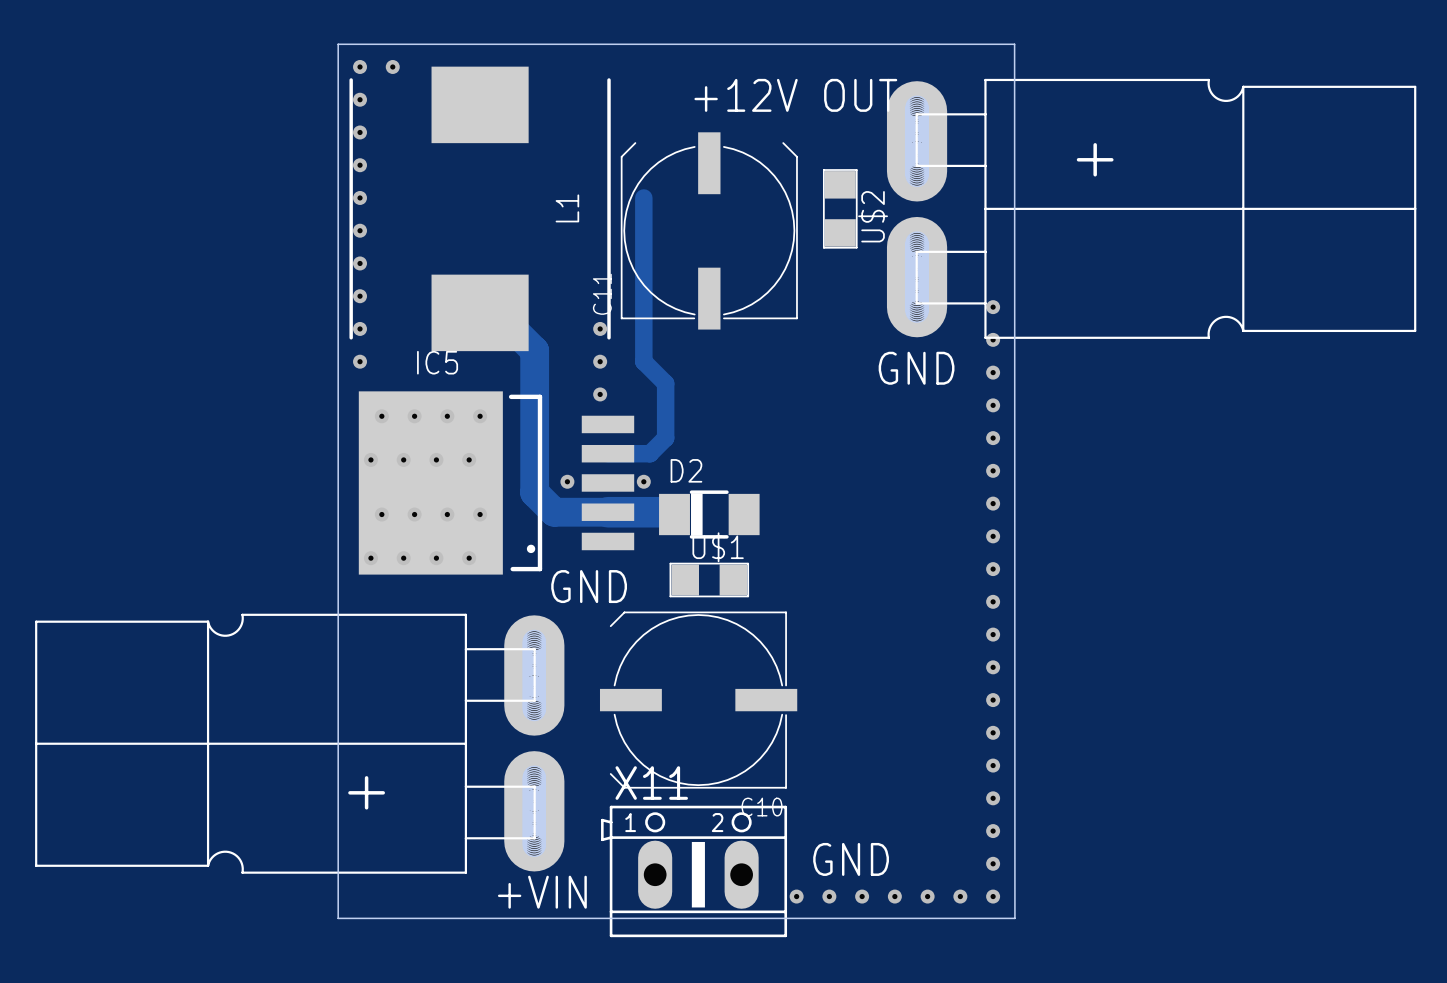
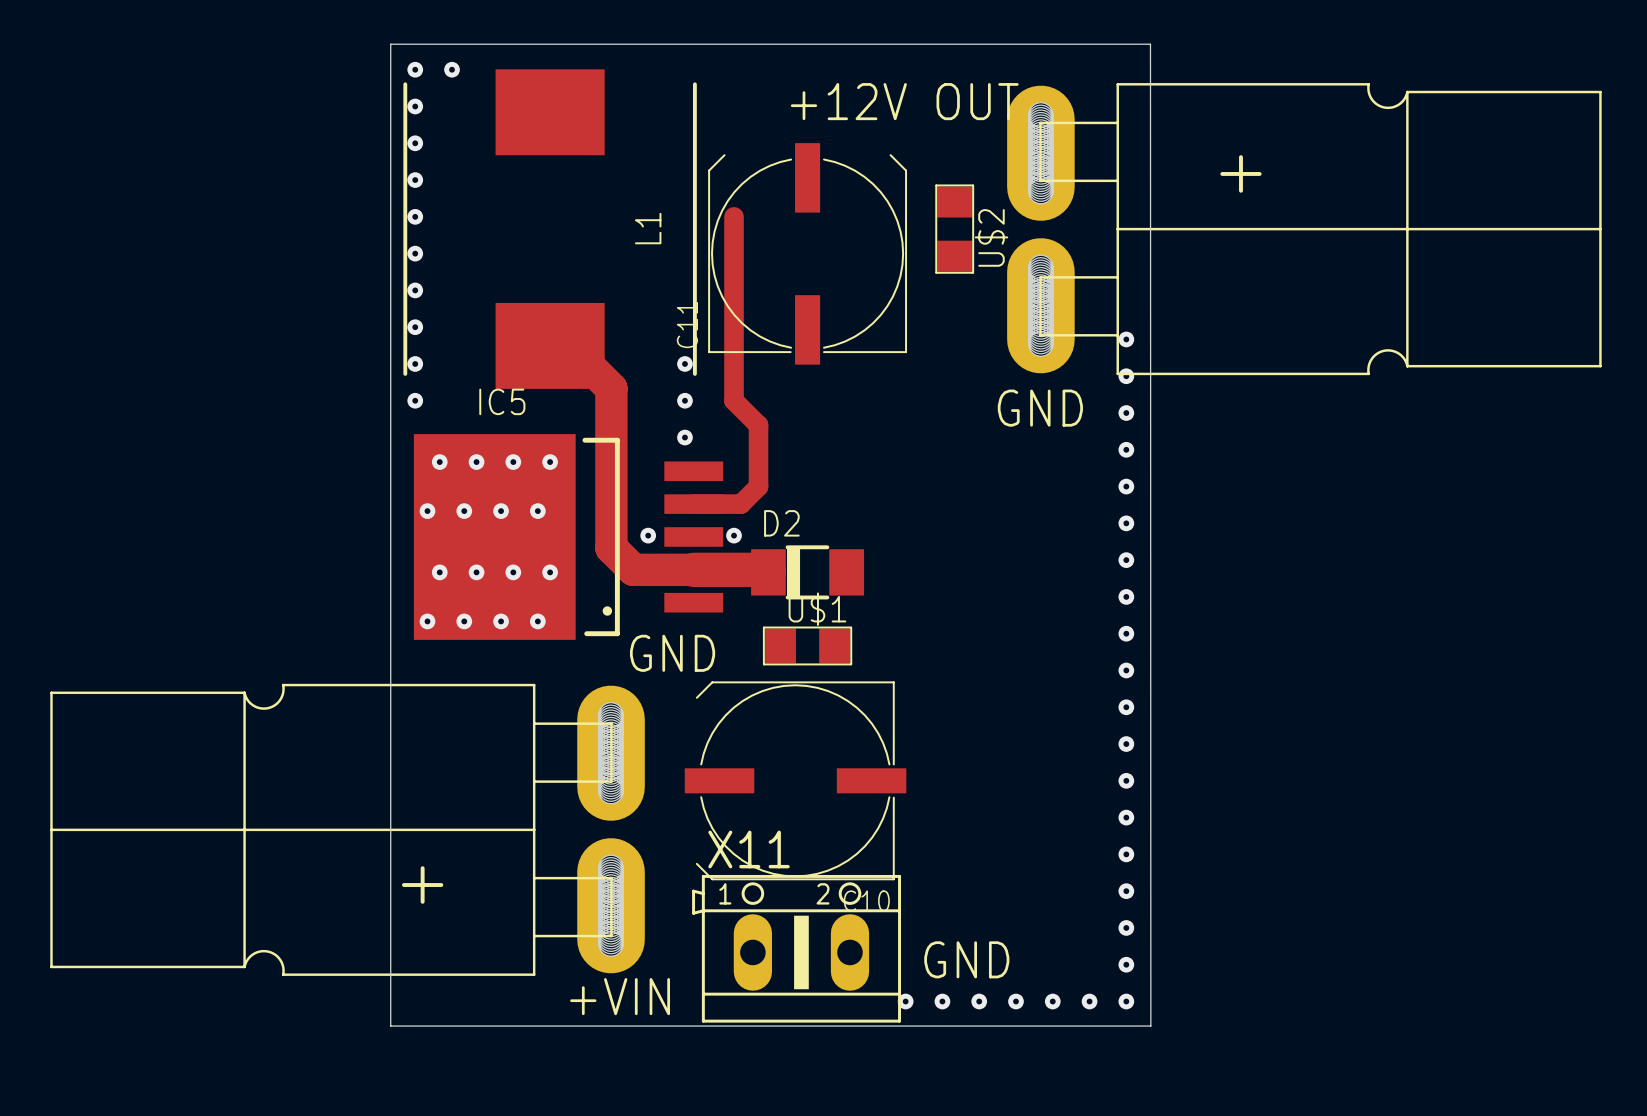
X11 position: (694, 871) -> (796, 948)

